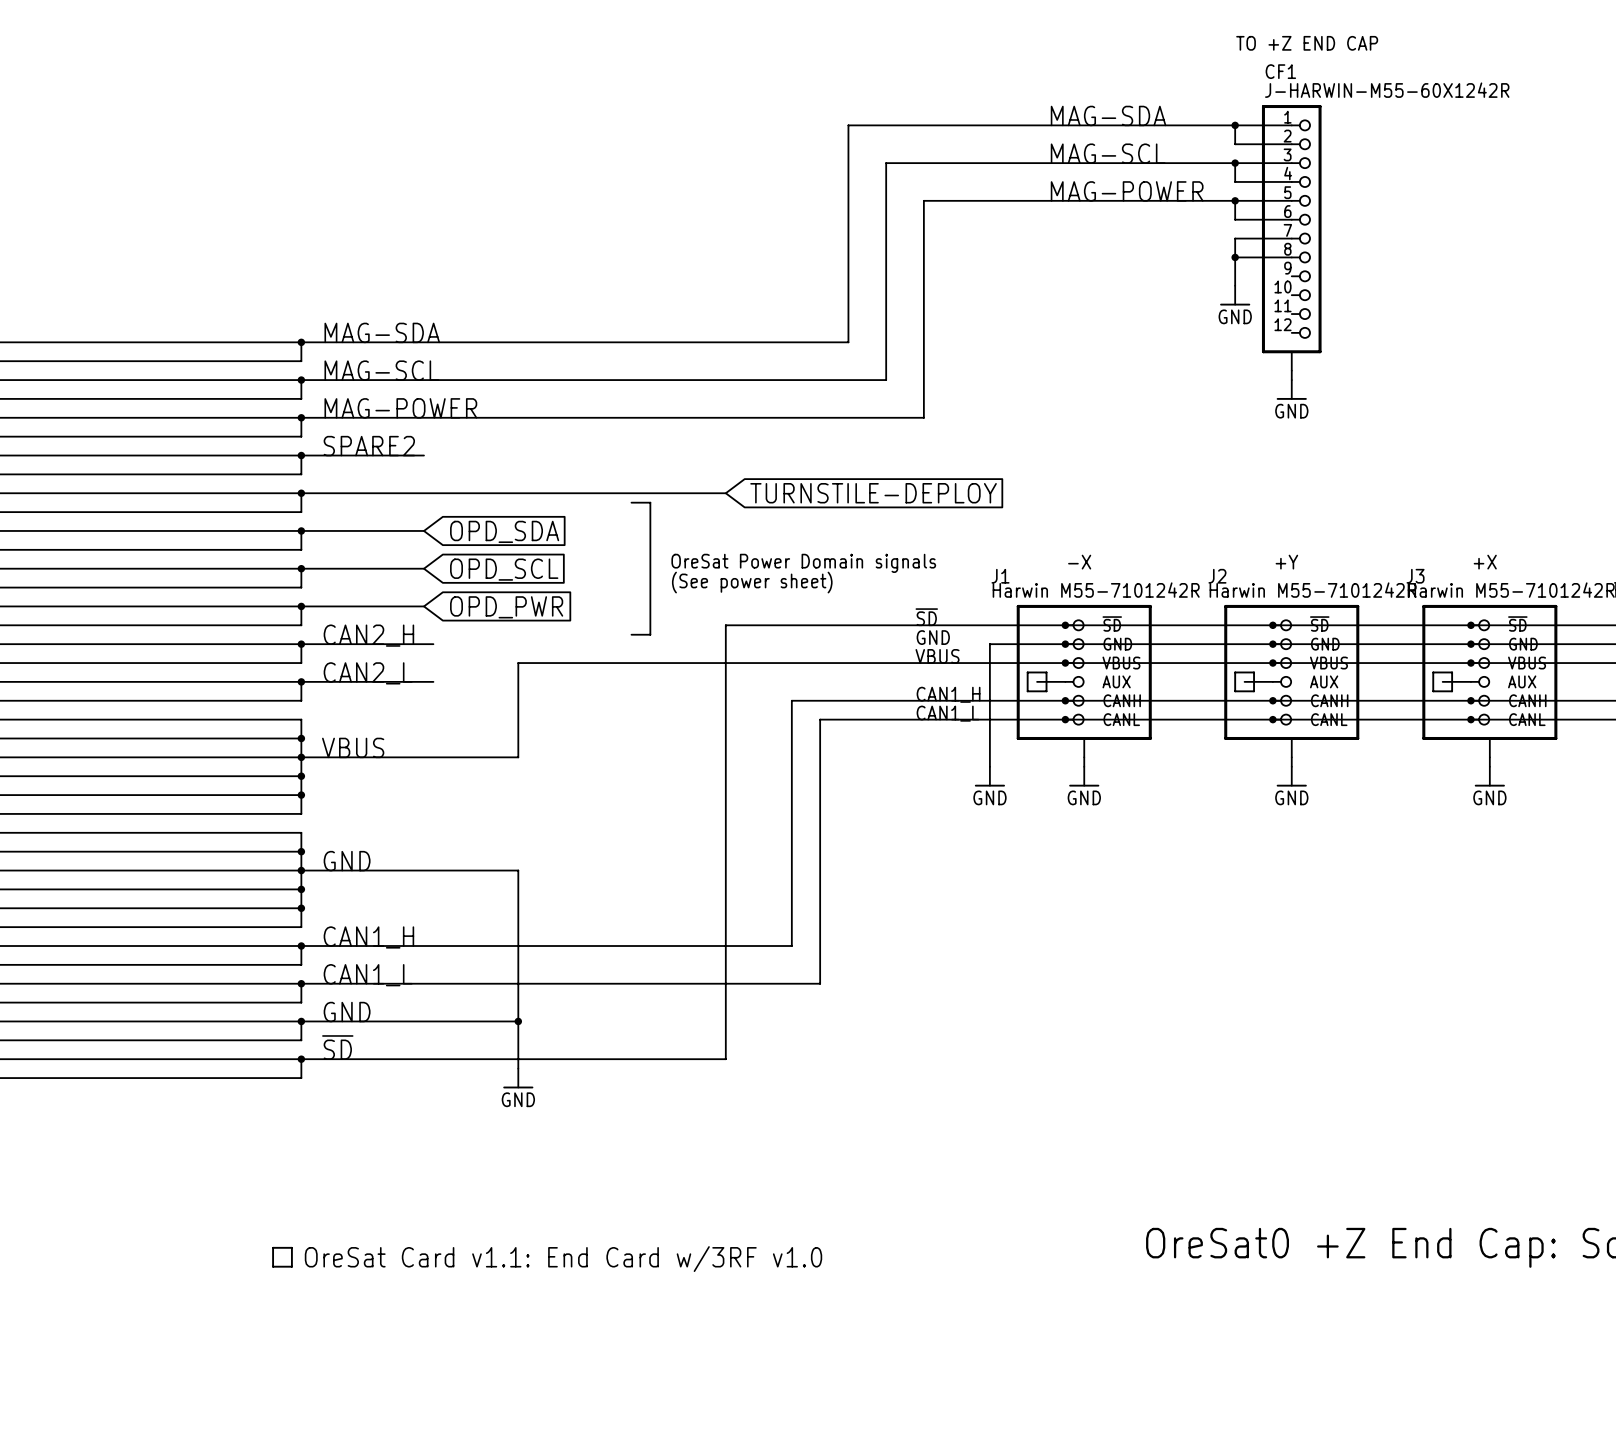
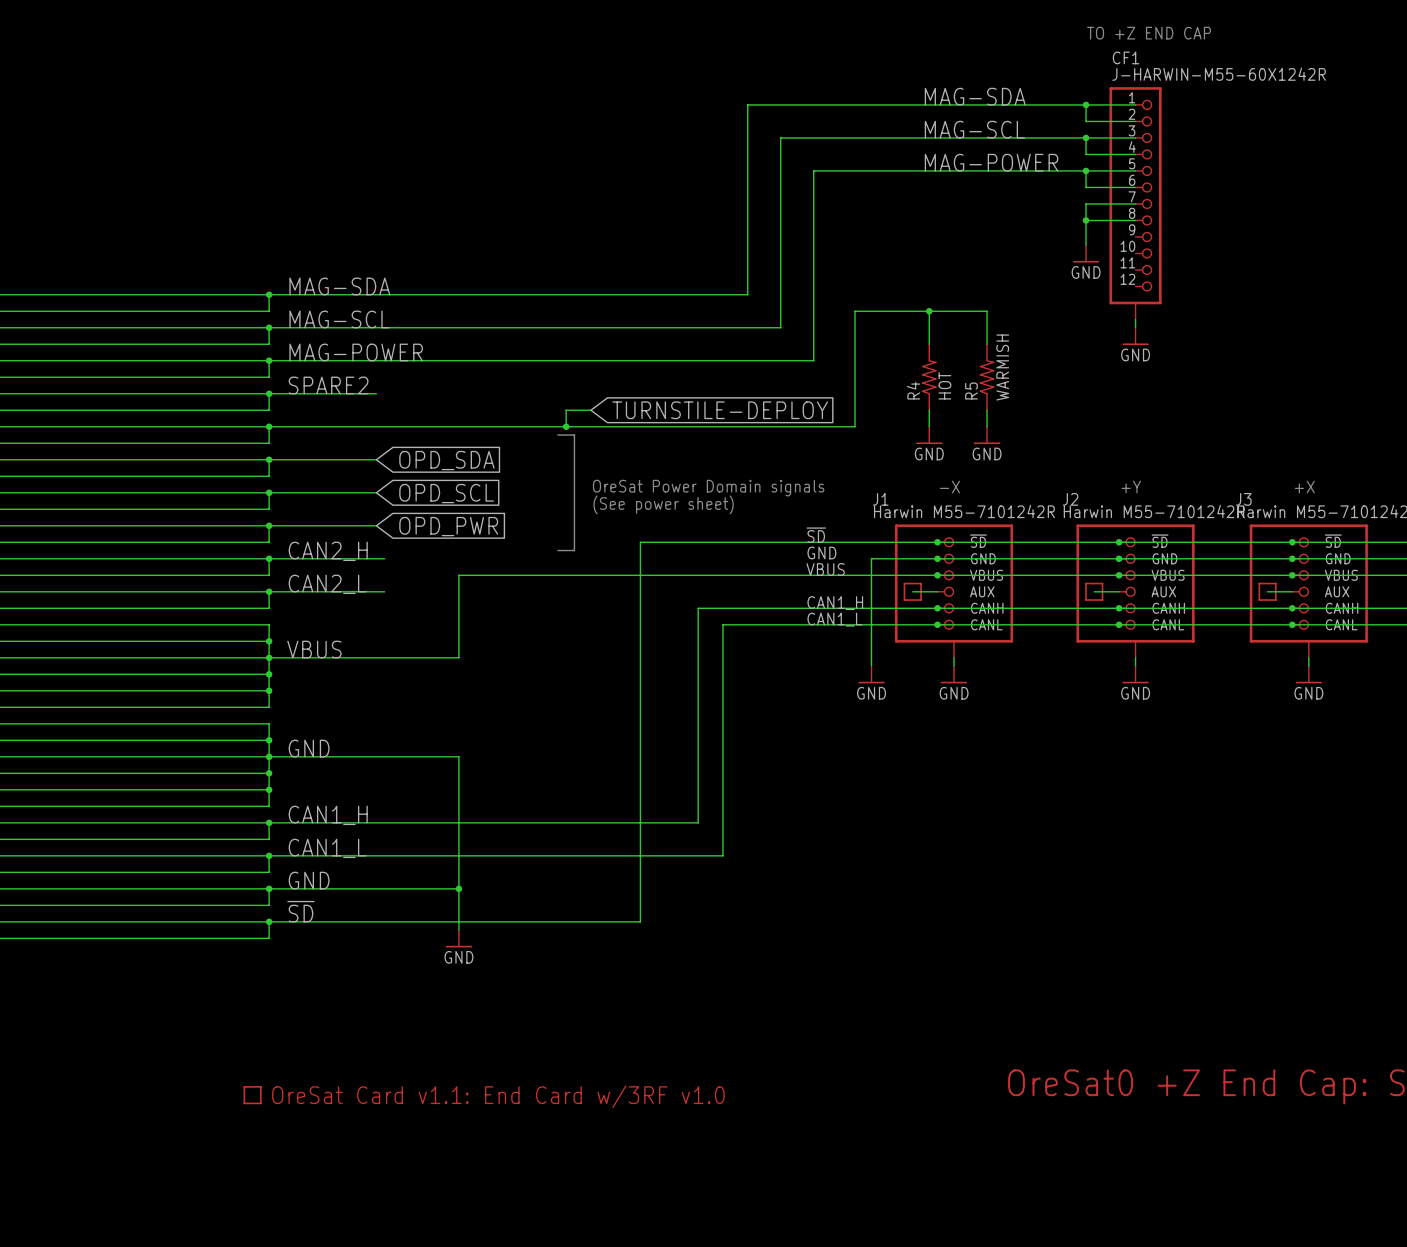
wire: none -> (929, 311) (929, 344)
junction: none -> (929, 311)
wire: none -> (987, 344) (987, 311) (854, 311) (854, 426) (640, 426)
R4: none -> HOT (929, 377)
R5: none -> WARMISH (987, 377)
wire: none -> (590, 410) (566, 410) (566, 426)
wire: none -> (929, 410) (929, 426)
wire: none -> (987, 410) (987, 426)
junction: none -> (566, 426)
global label position: TURNSTILE-DEPLOY (873, 493) -> TURNSTILE-DEPLOY (720, 410)
power symbol: none -> GND (929, 435)
power symbol: none -> GND (987, 435)

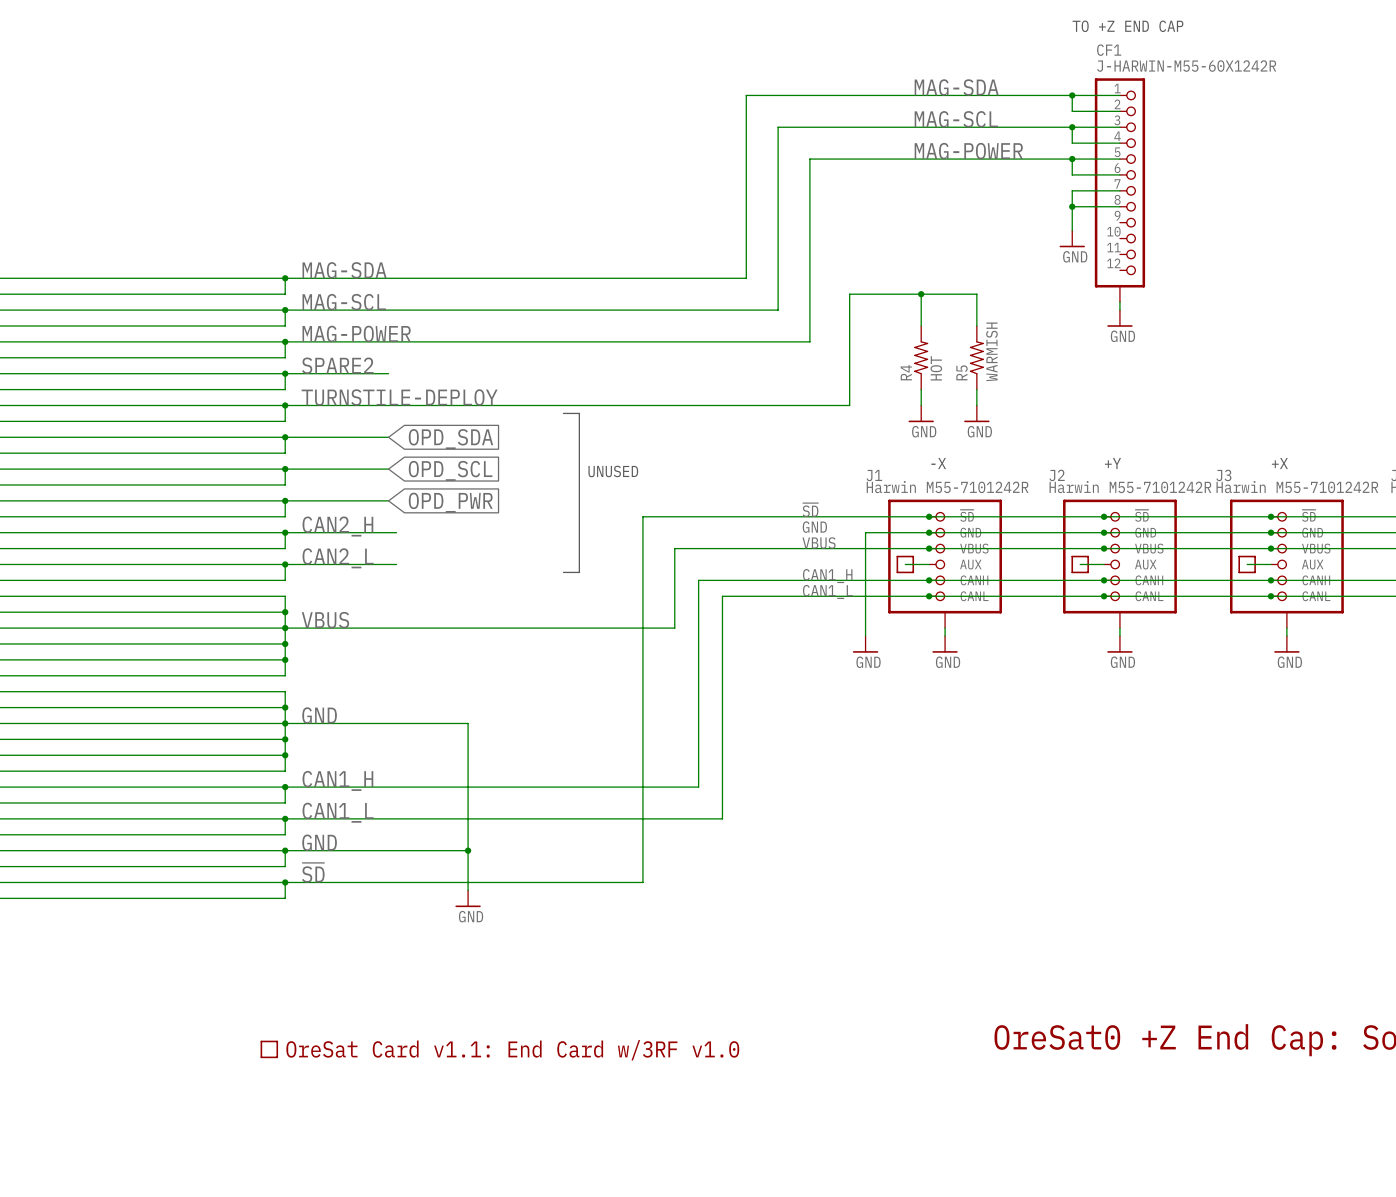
wire: (590, 410) (566, 410) (566, 426) -> none
global label: TURNSTILE-DEPLOY (720, 410) -> none
label: none -> TURNSTILE-DEPLOY (399, 397)
junction: (566, 426) -> none
text: OreSat Power Domain signals (708, 488) -> none
text: none -> UNUSED (613, 471)
text: (See power sheet) (663, 504) -> none
line: (557, 550) (574, 550) -> (563, 572) (579, 572) (579, 524)
wire: (673, 575) (458, 575) (458, 657) -> (674, 548) (674, 628) (468, 628)

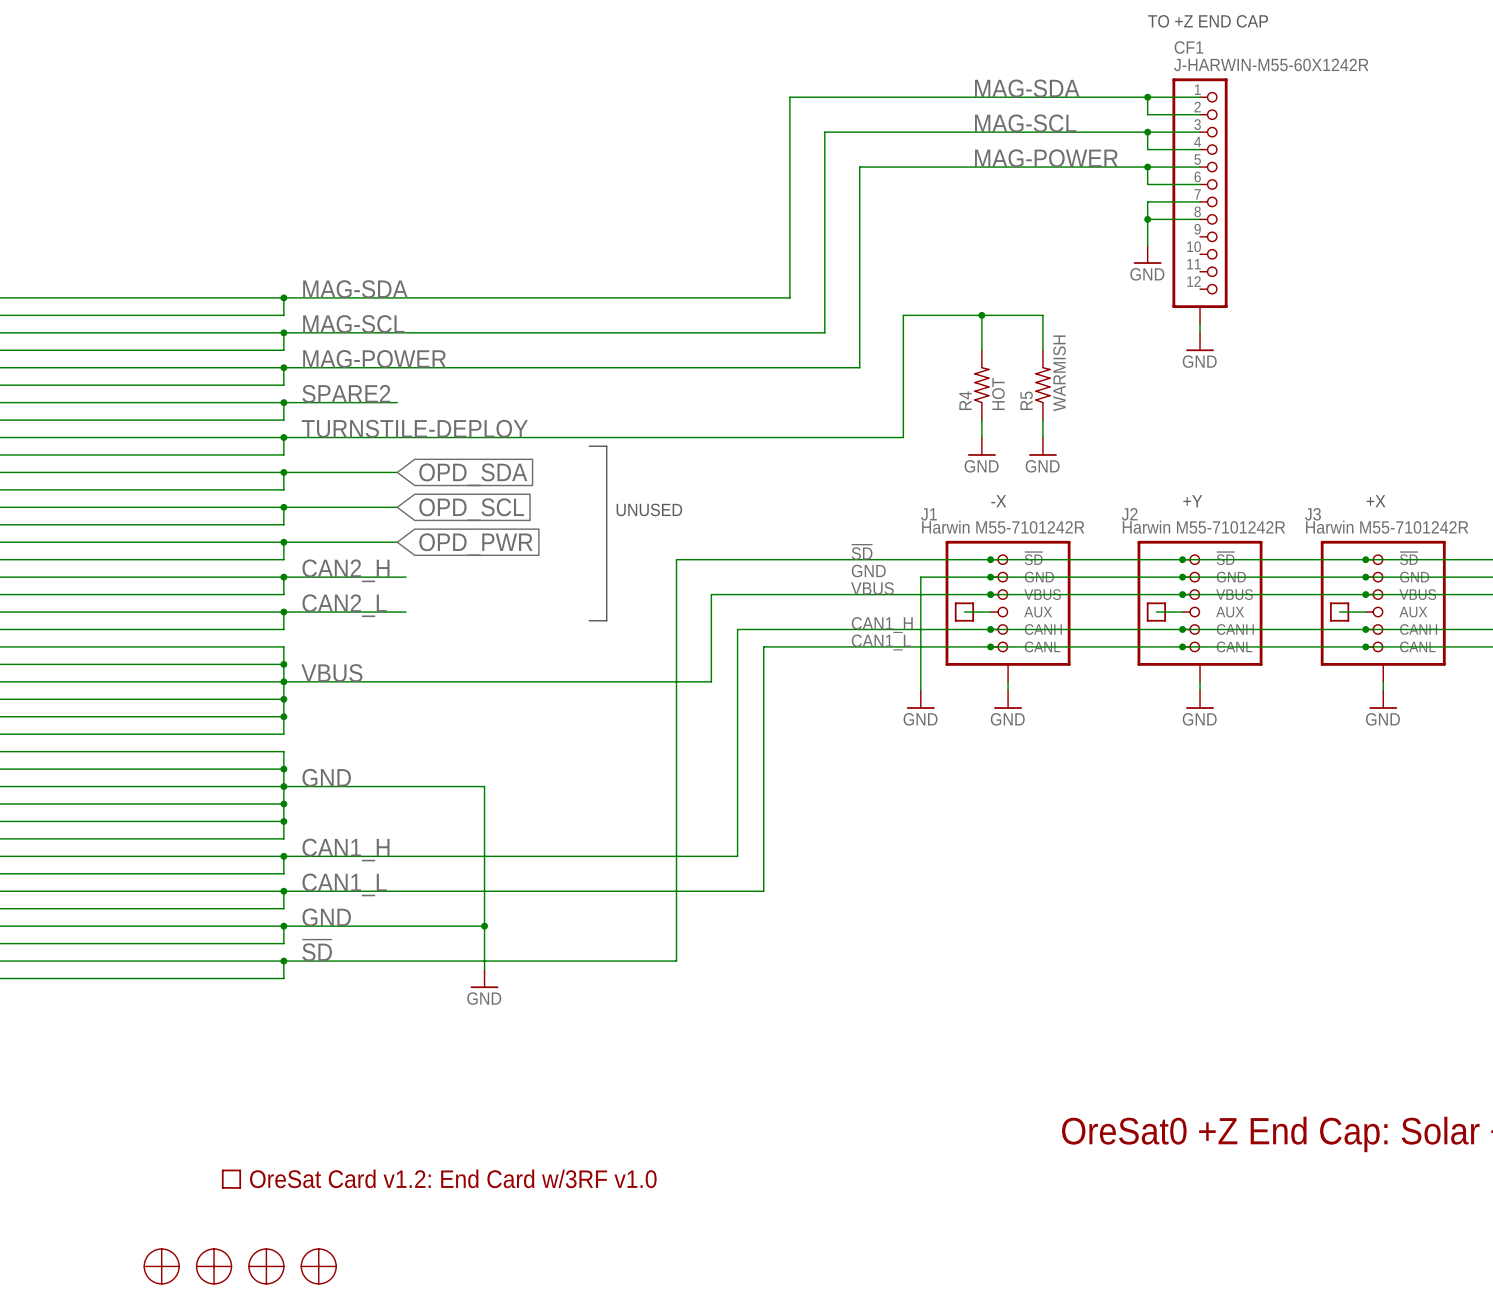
part: (269, 1049) -> none
part: none -> (231, 1179)
part: none -> (161, 1266)
part: none -> (214, 1266)
part: none -> (266, 1266)
part: none -> (318, 1266)

